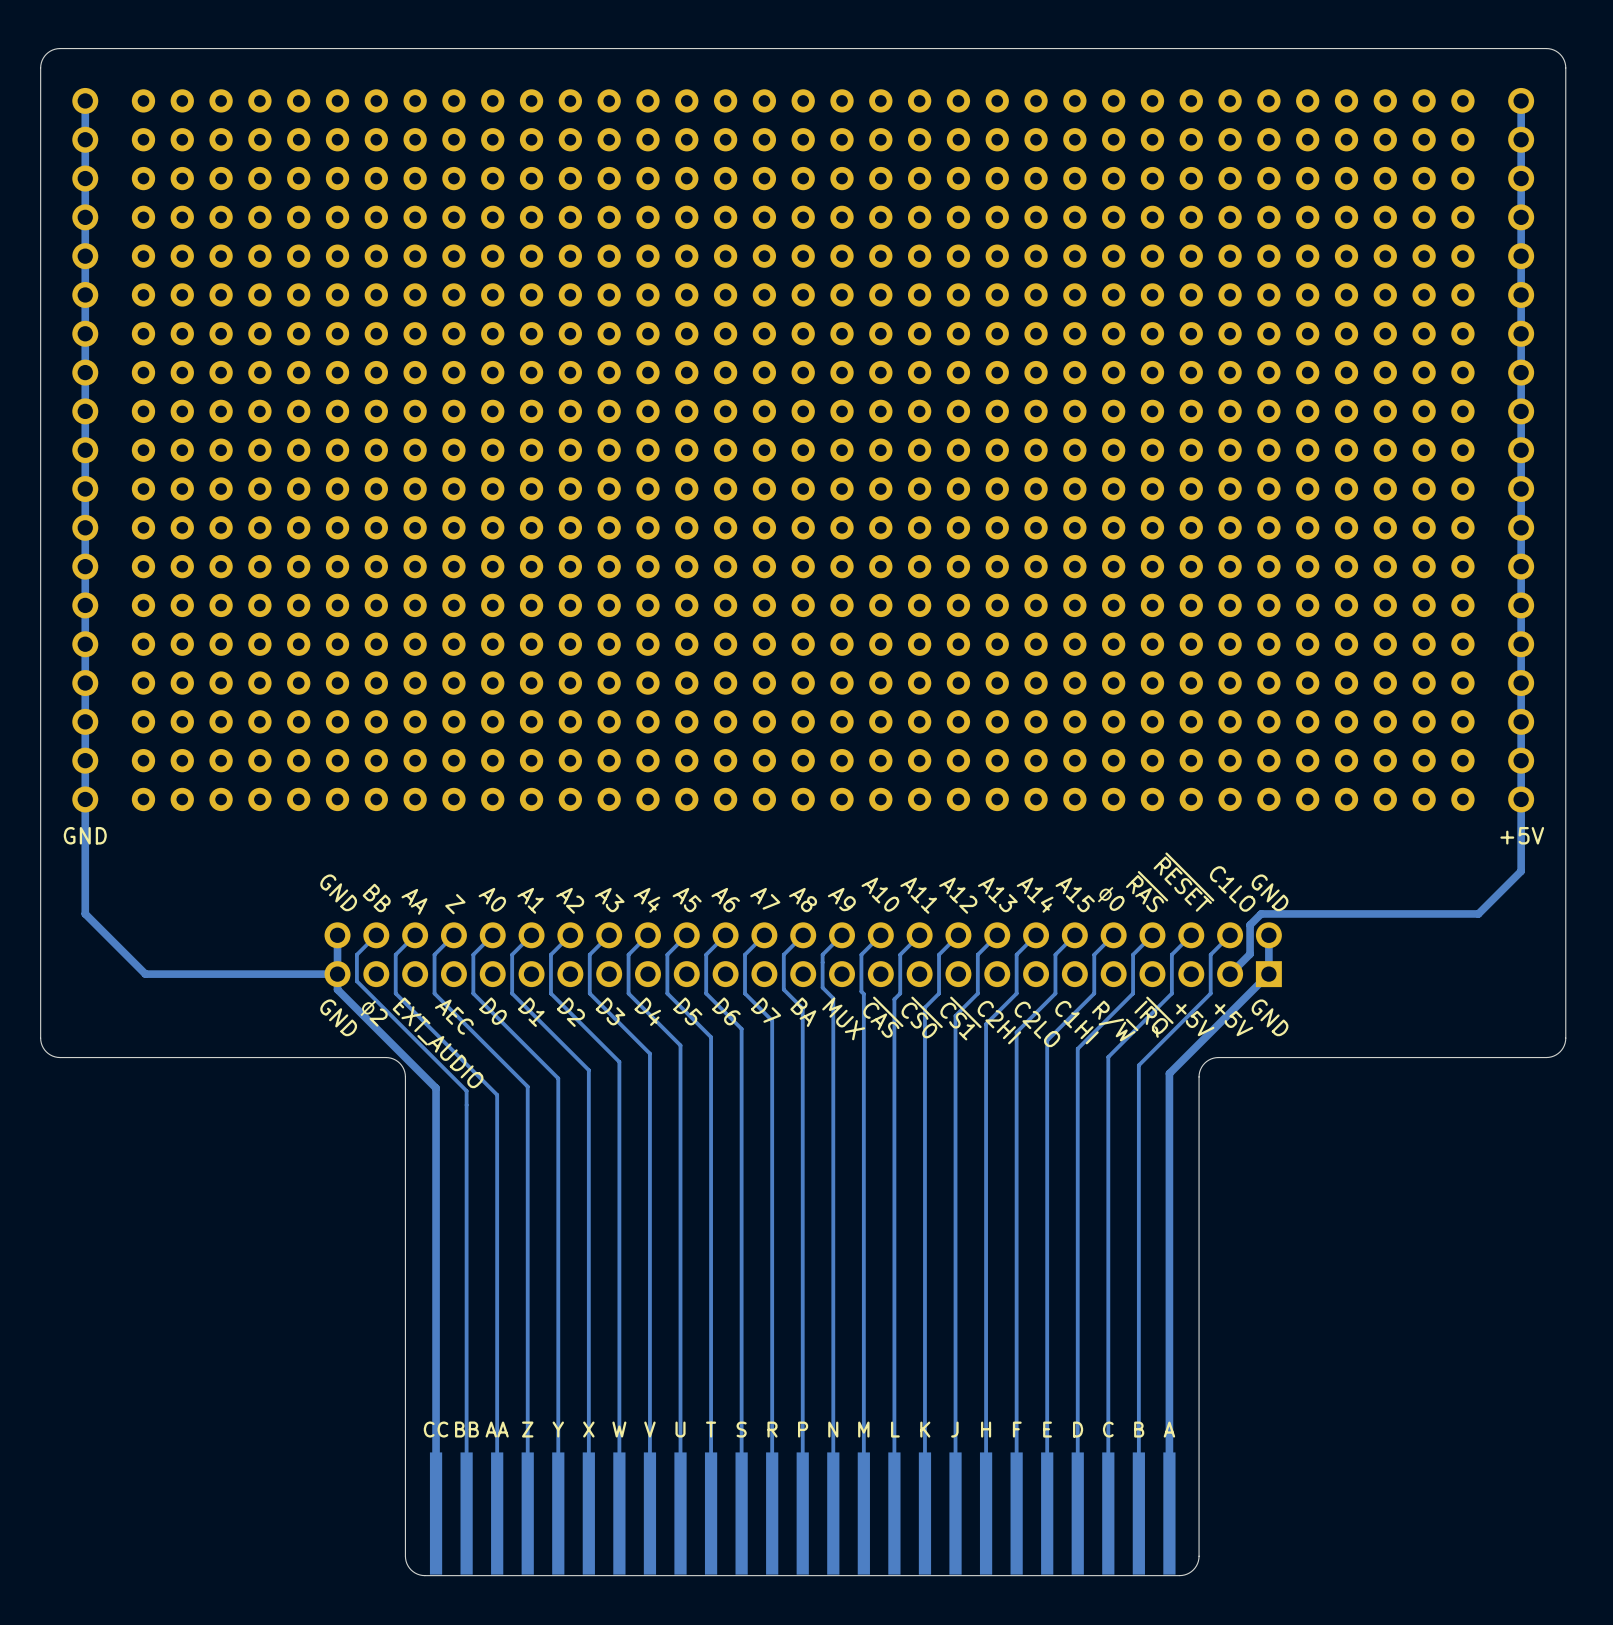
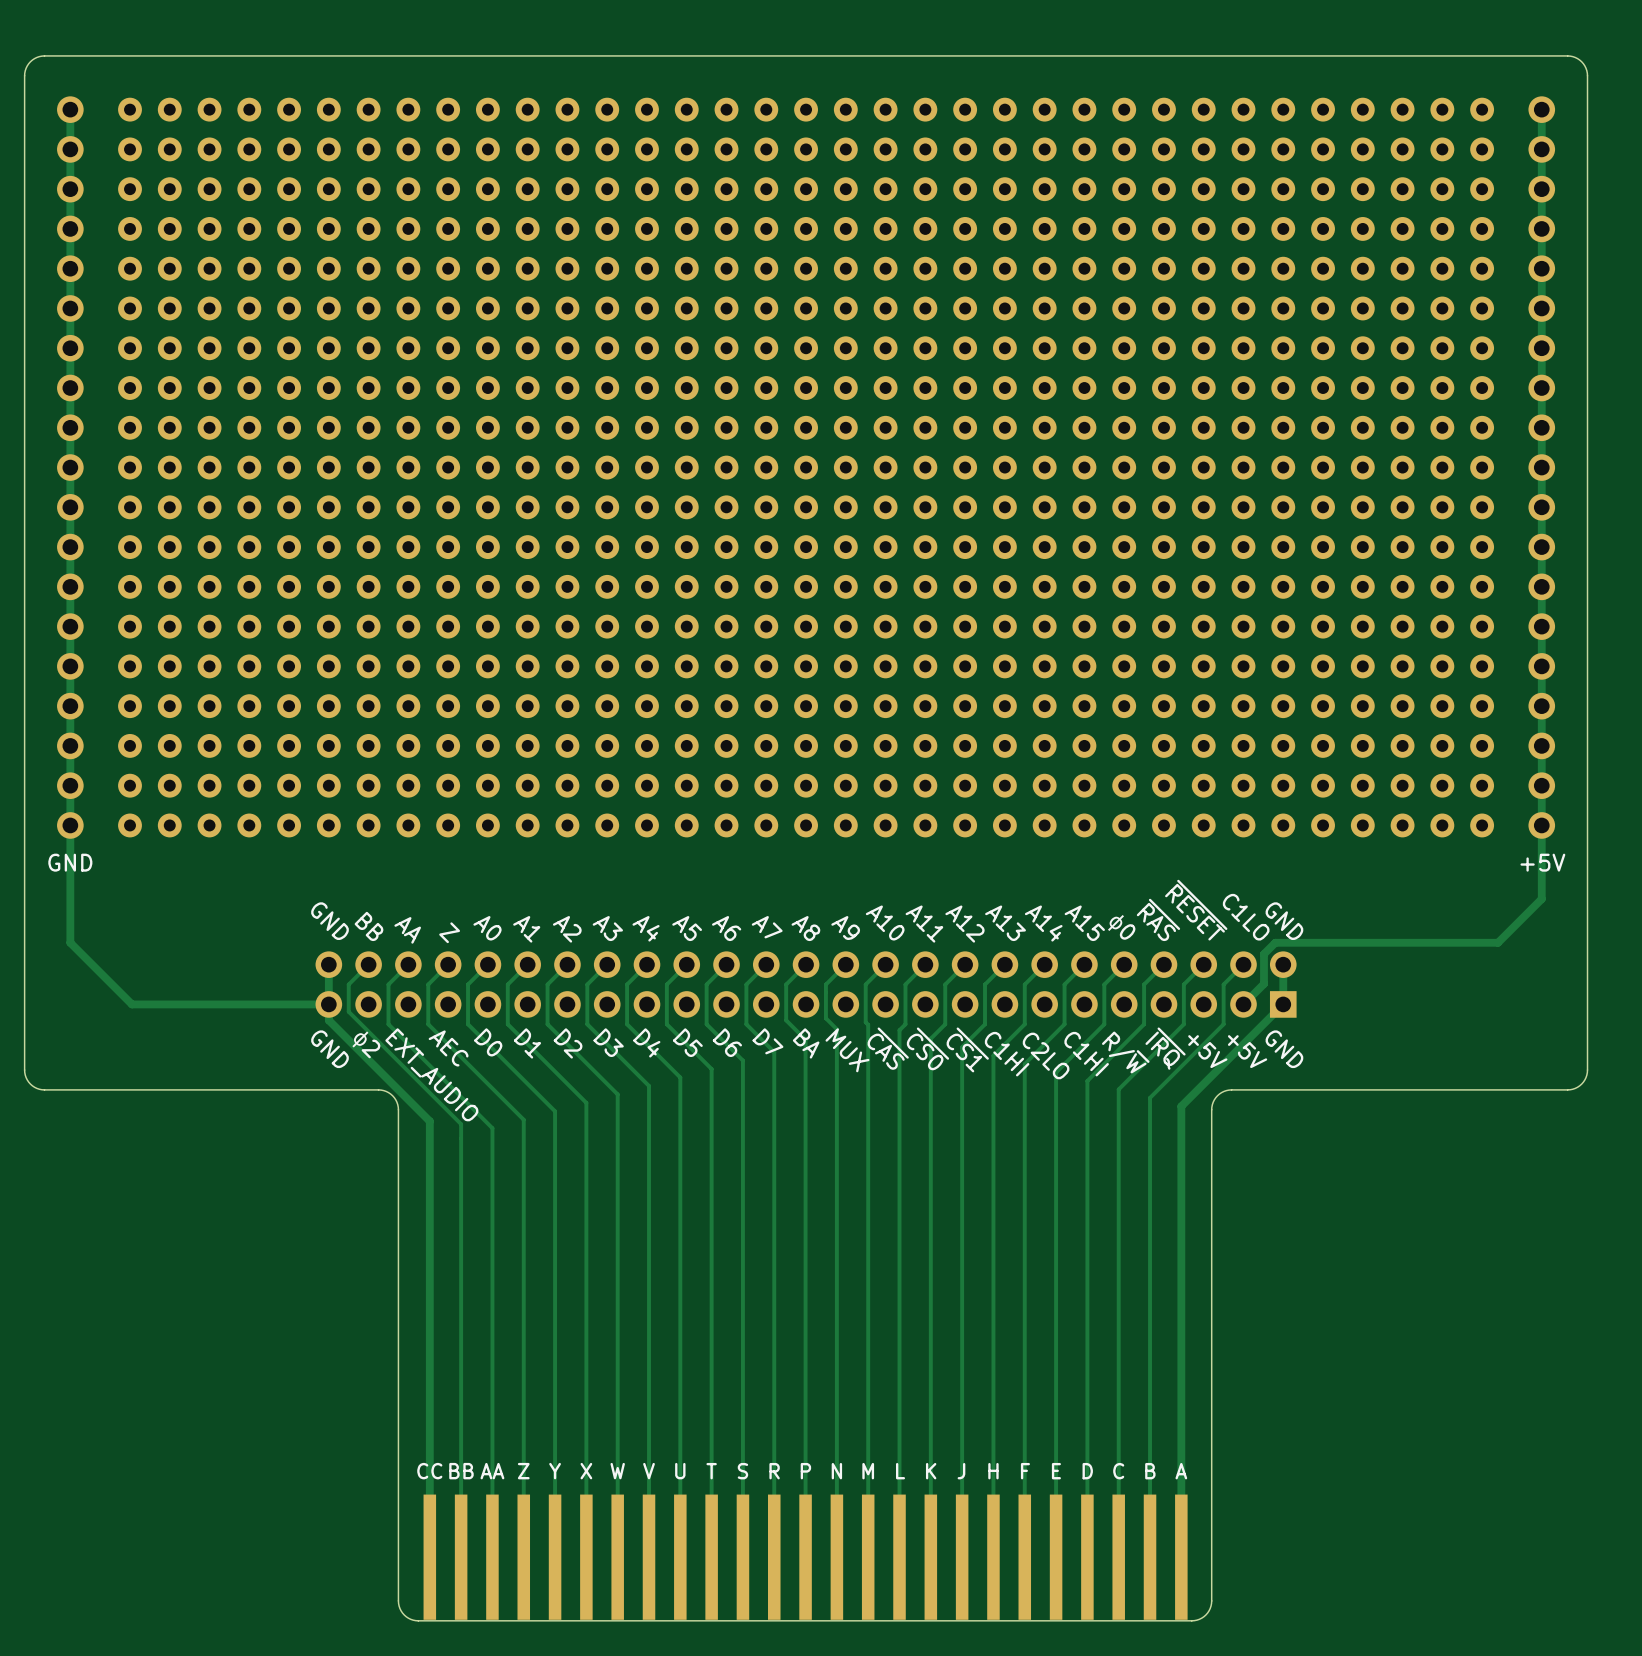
text: C2HI (999, 1022) -> C1HI (1007, 1054)

